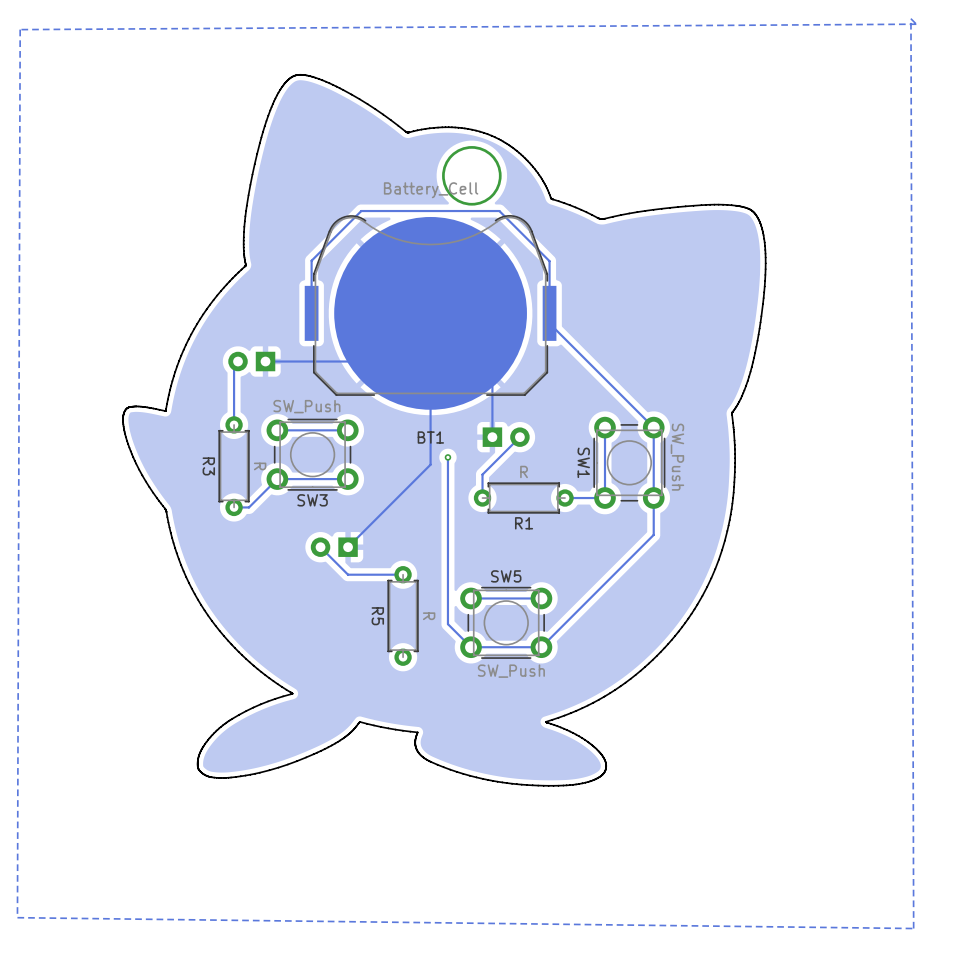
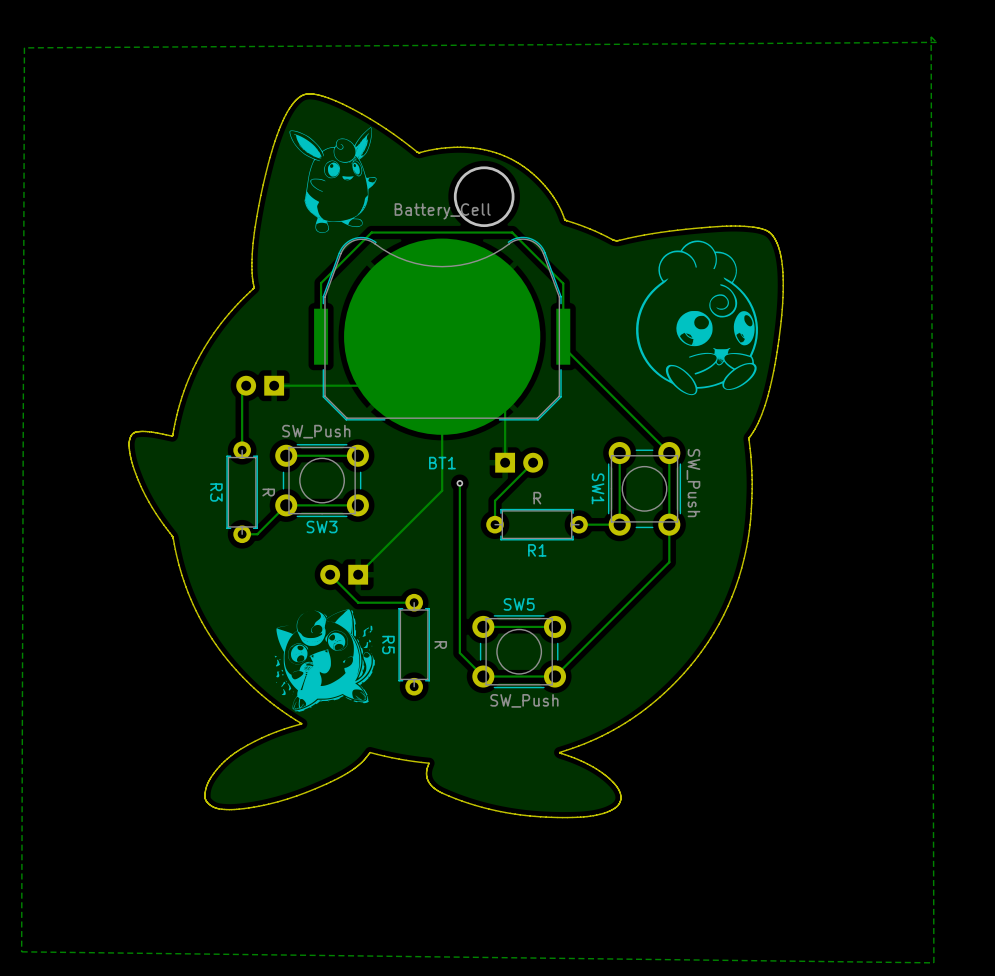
drawing: none -> [289, 127, 377, 234]
drawing: none -> [636, 240, 758, 396]
drawing: none -> [274, 609, 375, 712]

